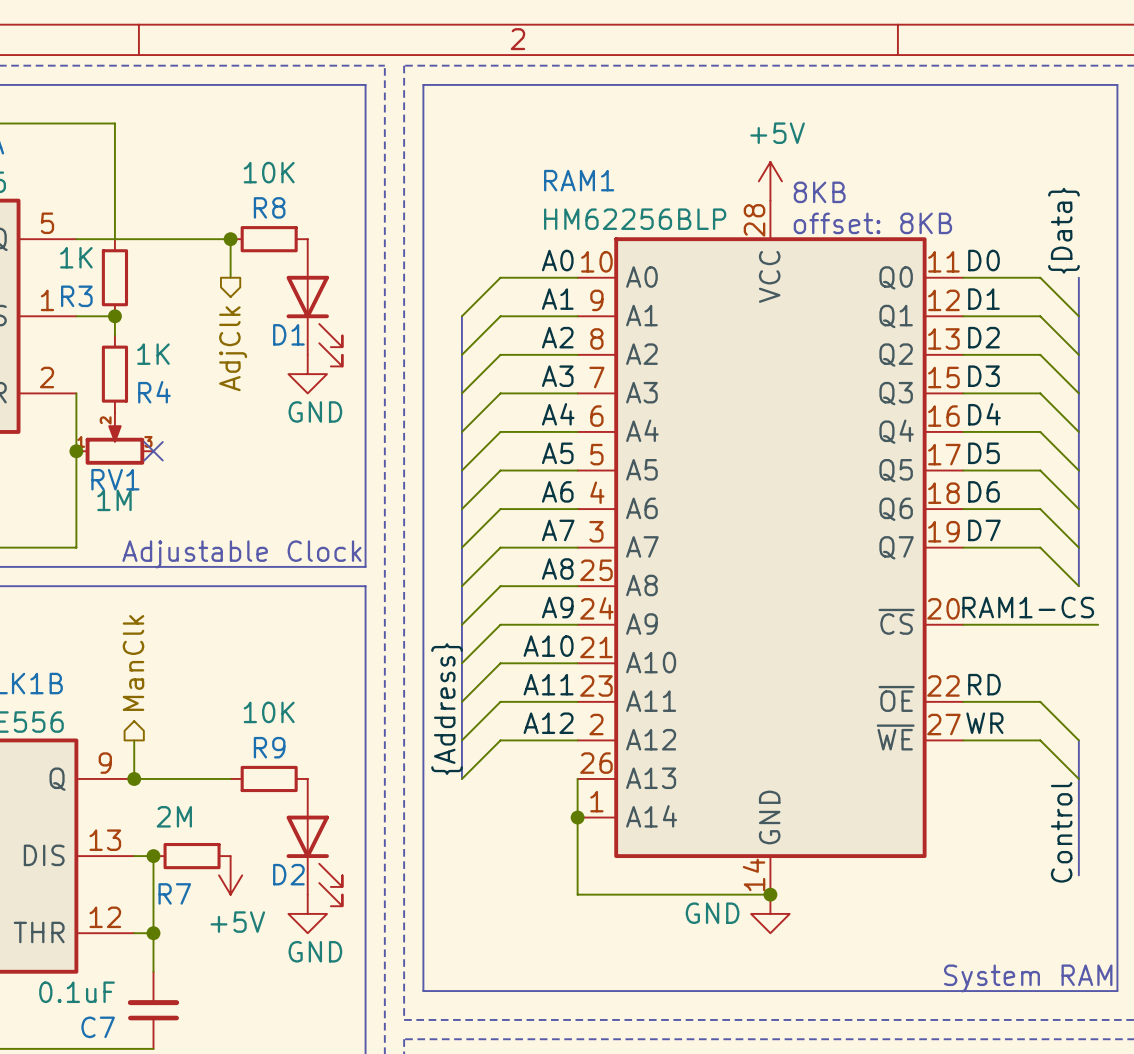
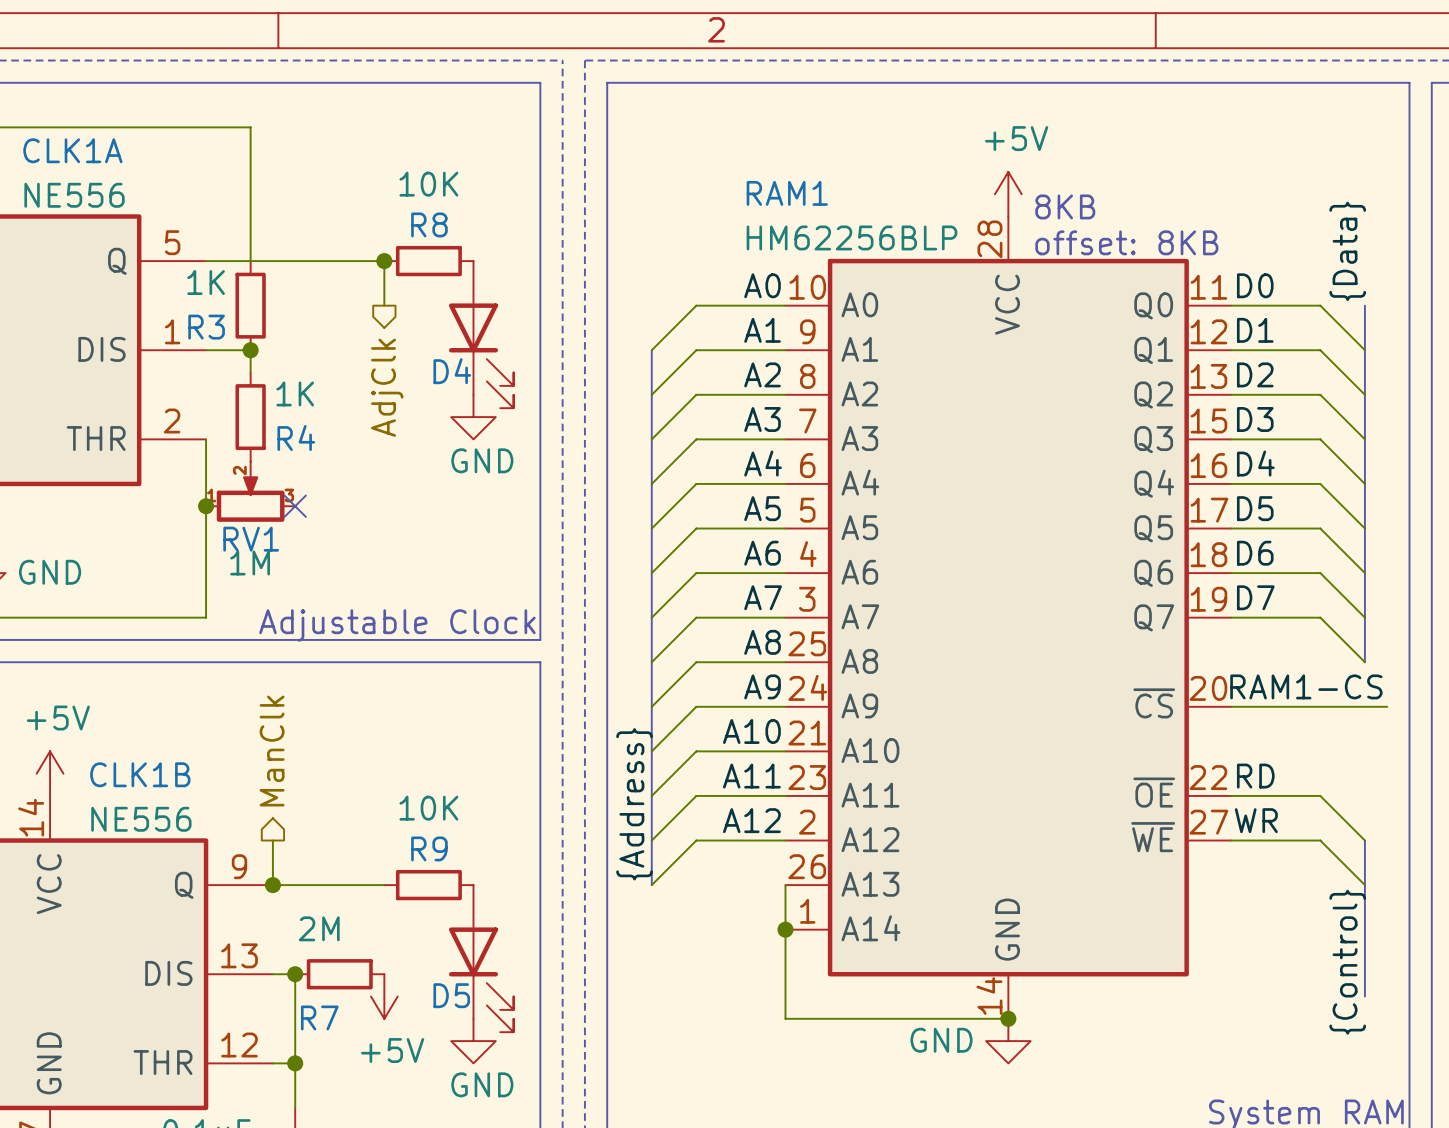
D1 name: D1 (288, 334) -> D4 (452, 371)
label: Control (1061, 832) -> {Control} (1347, 962)
D2 name: D2 (288, 874) -> D5 (451, 995)

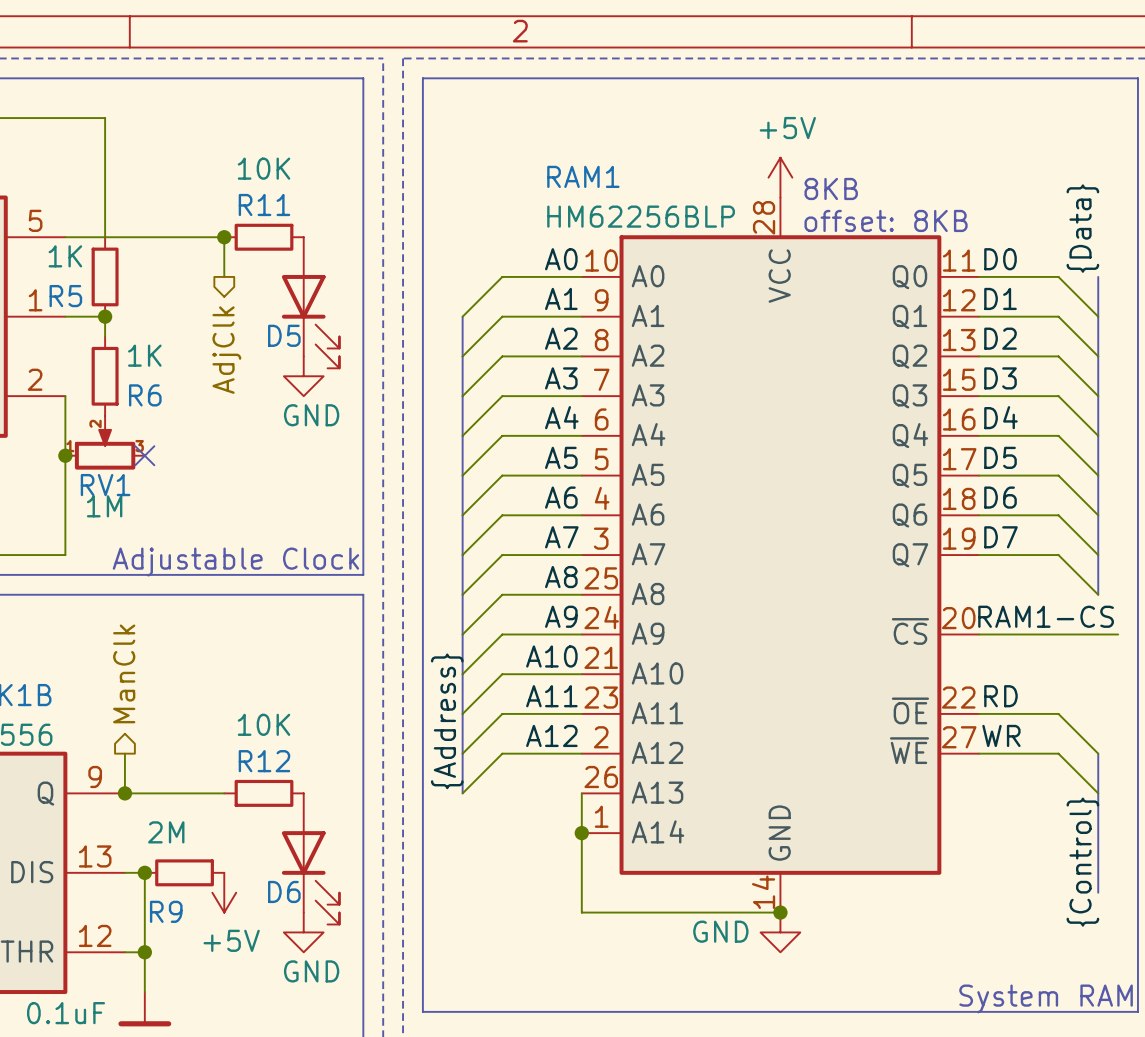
R8 name: R8 (429, 224) -> R11 (264, 205)
R3 name: R3 (206, 327) -> R5 (65, 296)
D4 name: D4 (452, 371) -> D5 (284, 335)
R4 name: R4 (296, 438) -> R6 (145, 395)
R9 name: R9 (429, 848) -> R12 (264, 761)
D5 name: D5 (451, 995) -> D6 (284, 891)
R7 name: R7 (319, 1017) -> R9 (166, 911)

